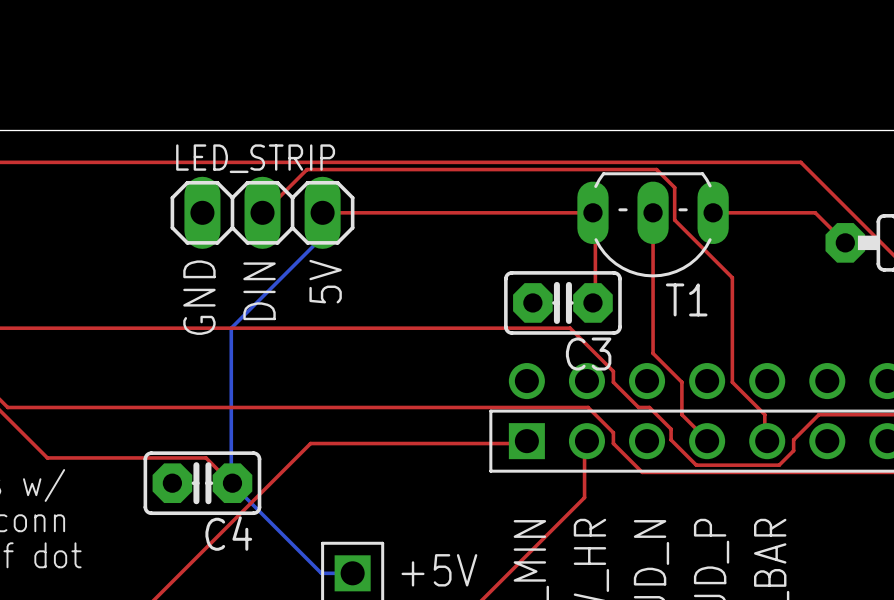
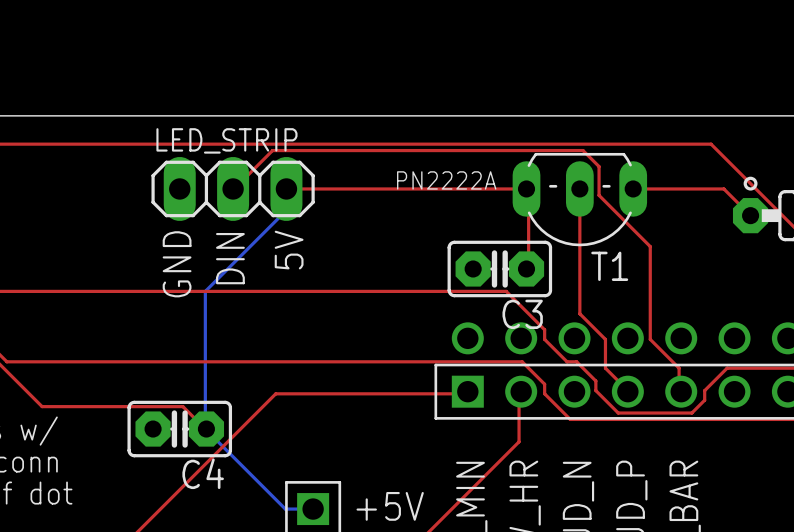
drawing: none -> [743, 176, 758, 191]
text: none -> PN2222A (446, 180)

